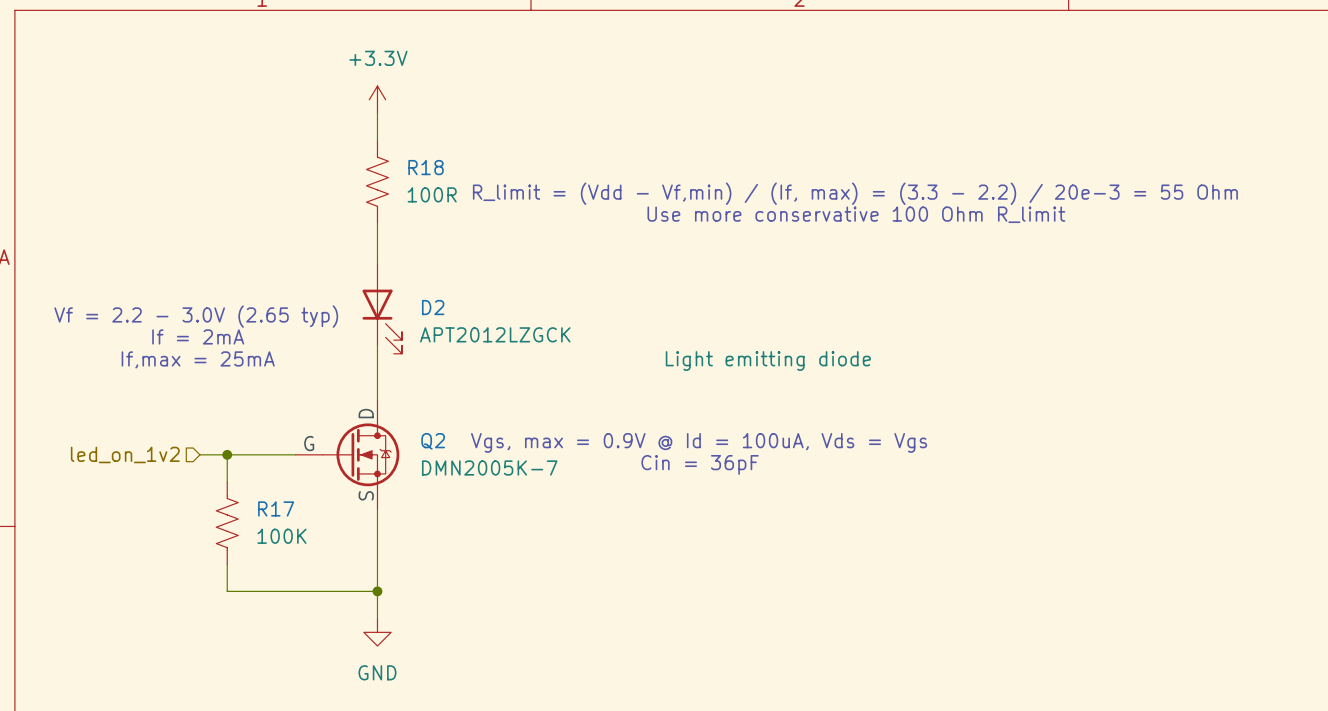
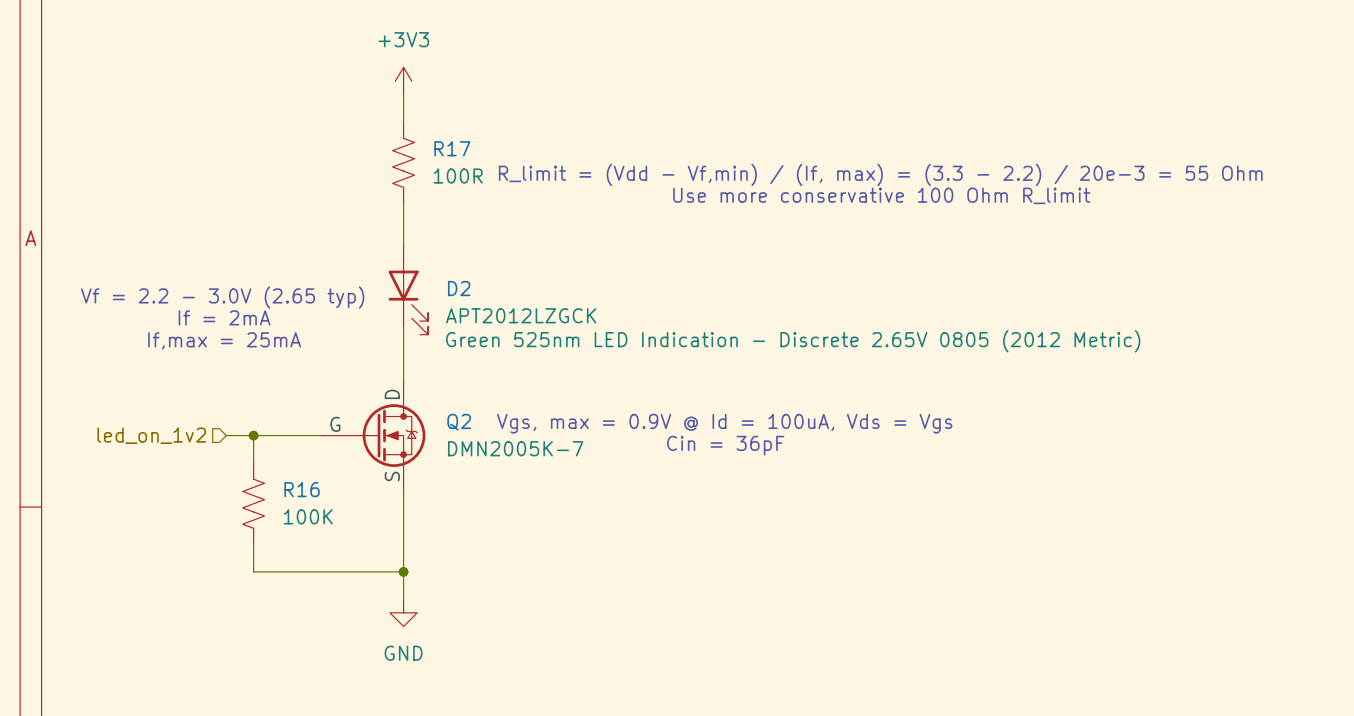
power symbol: +3.3V (377, 99) -> +3V3 (403, 81)
R18 name: R18 (426, 167) -> R17 (452, 148)
D2 text: Light emitting diode (768, 361) -> Green 525nm LED Indication - Discrete 2.65V 0805 (2012 Metric) (793, 341)
R17 name: R17 (276, 508) -> R16 (302, 489)

